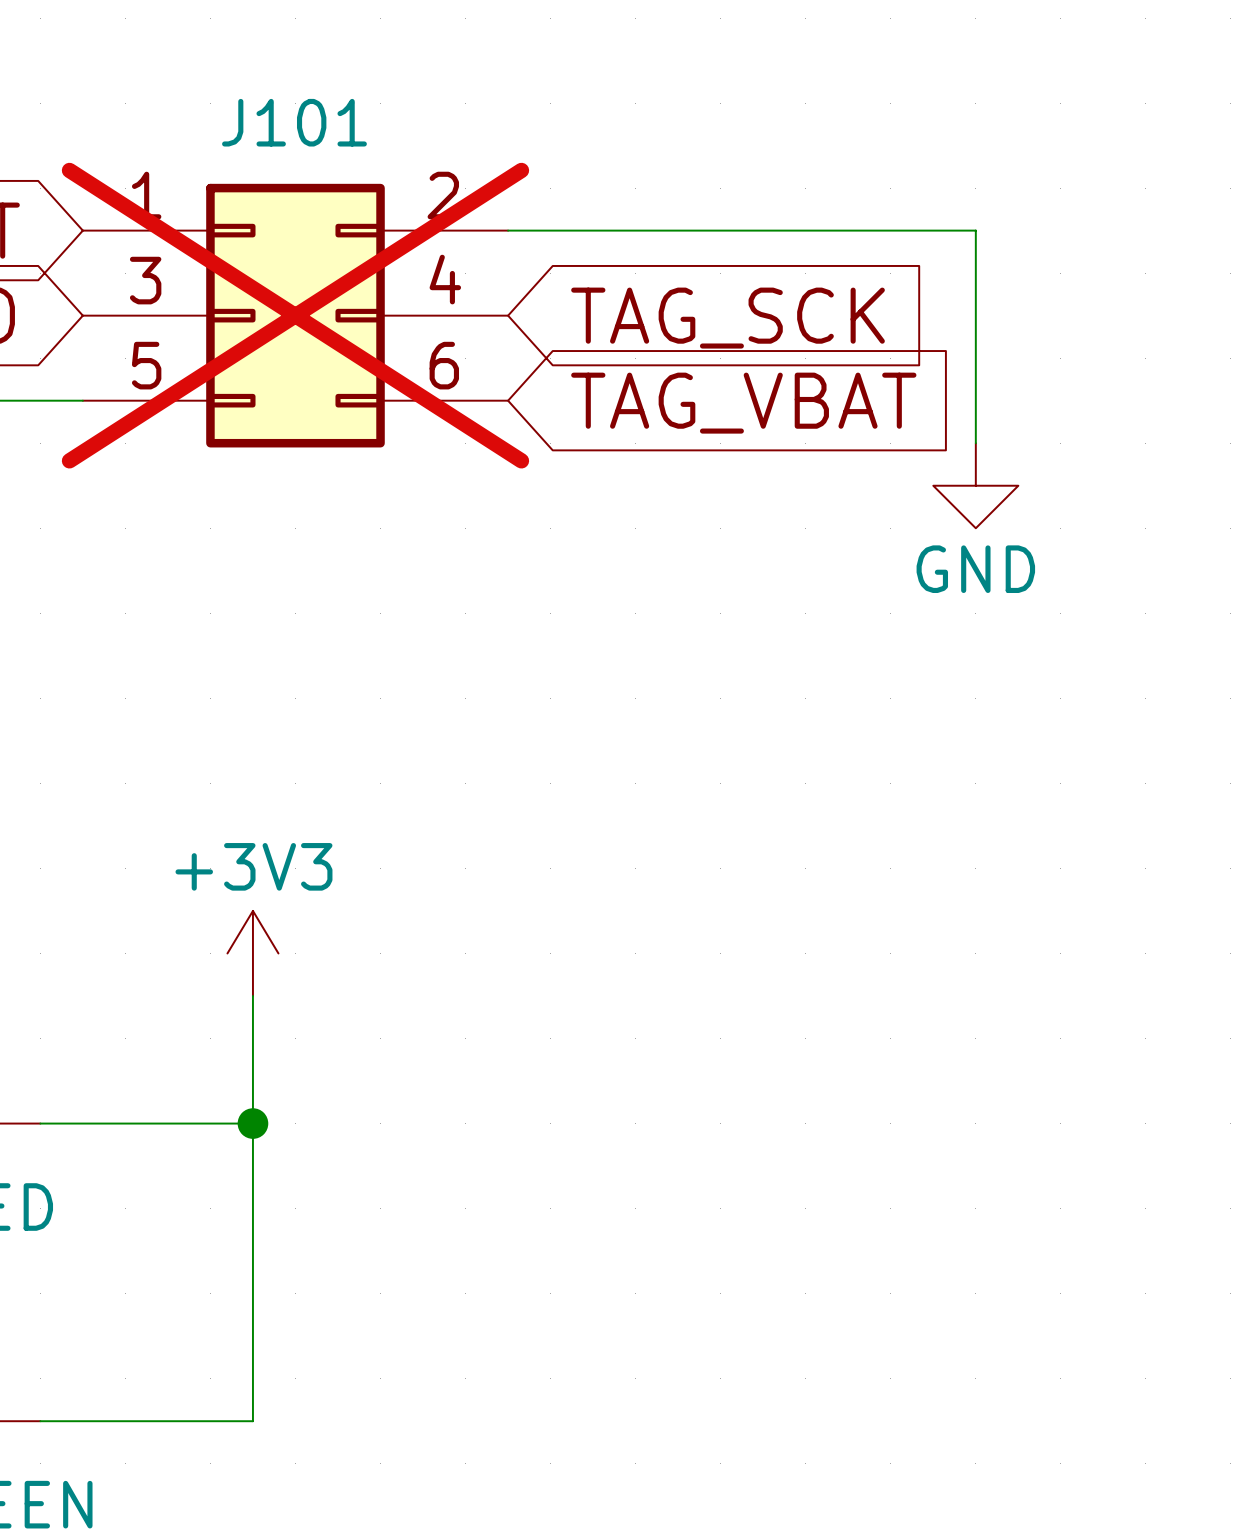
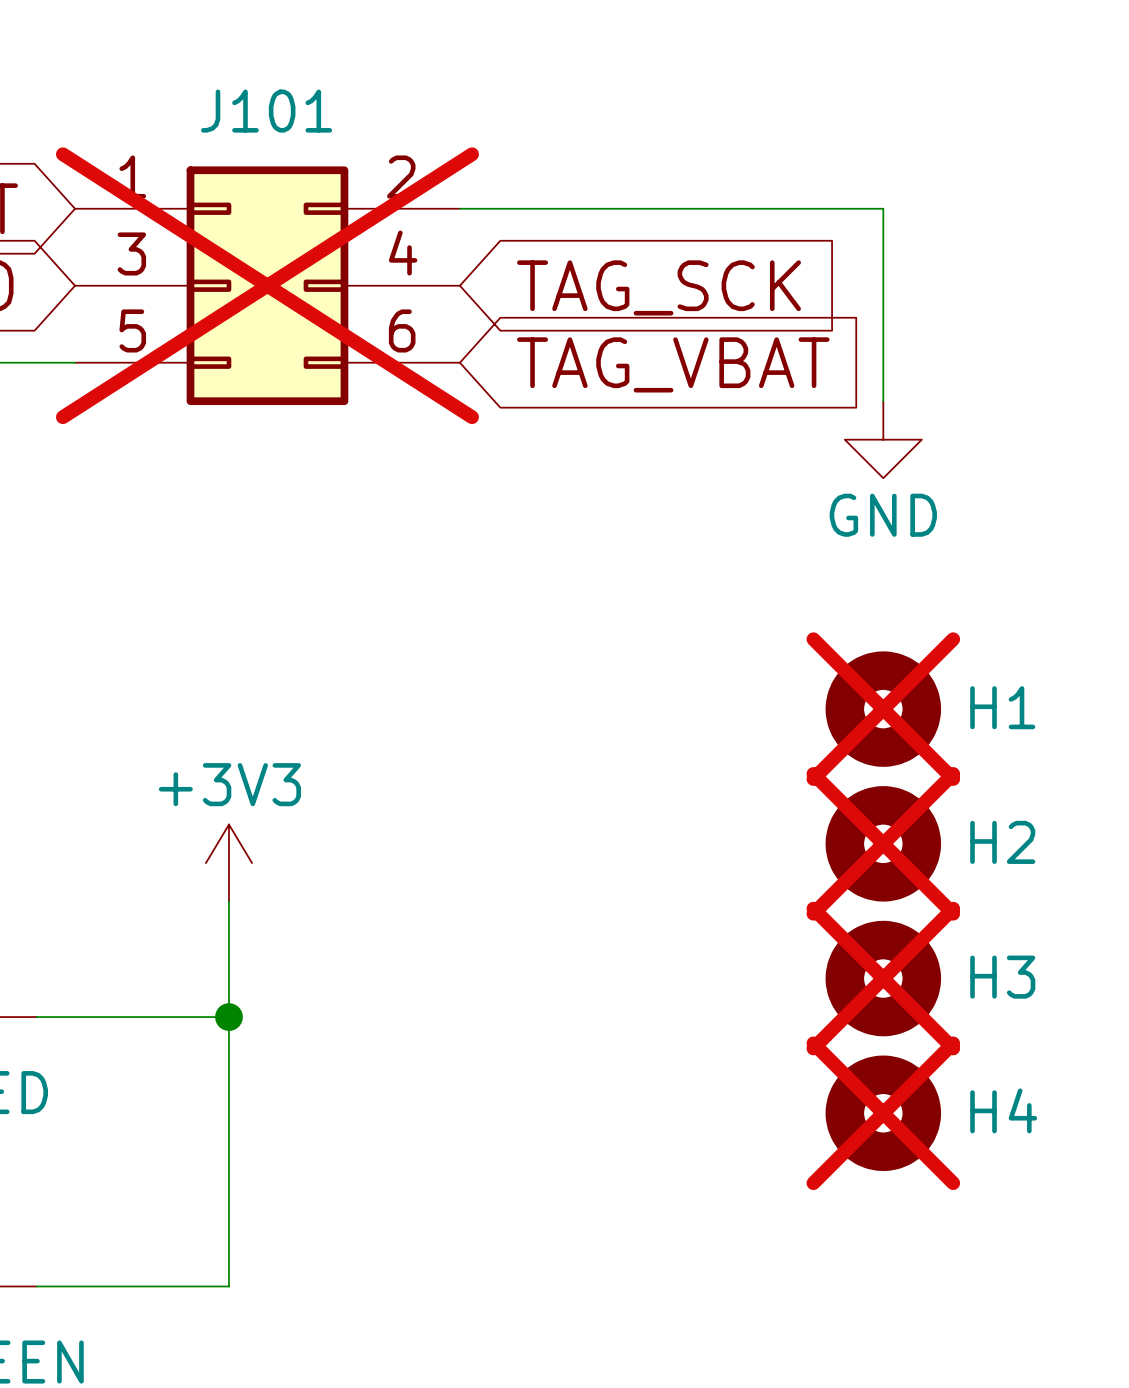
H1: none -> (883, 709)
H2: none -> (883, 843)
H3: none -> (883, 978)
H4: none -> (883, 1113)

